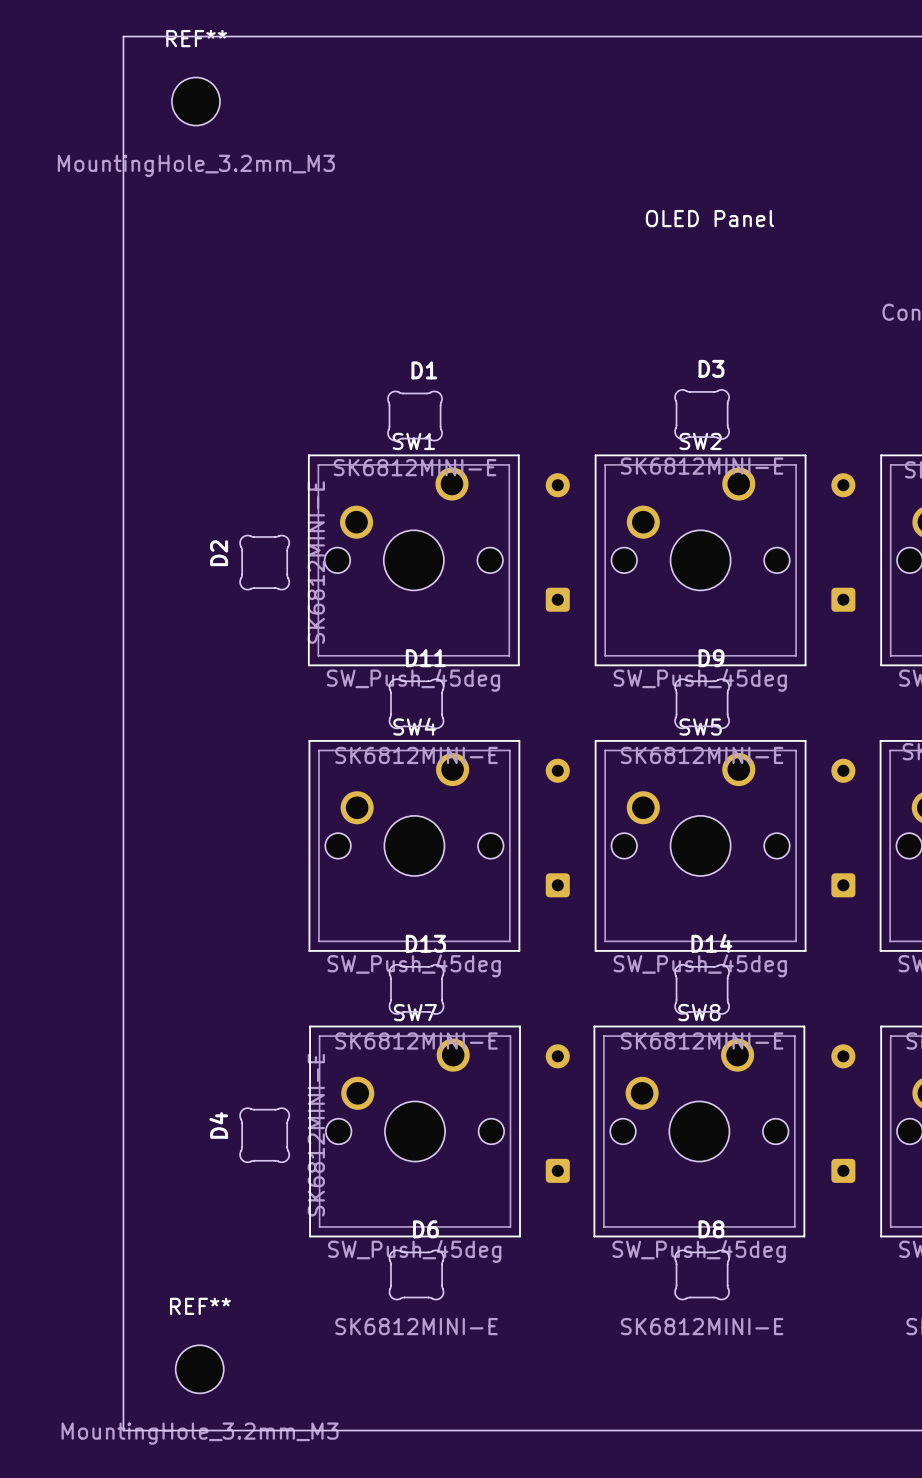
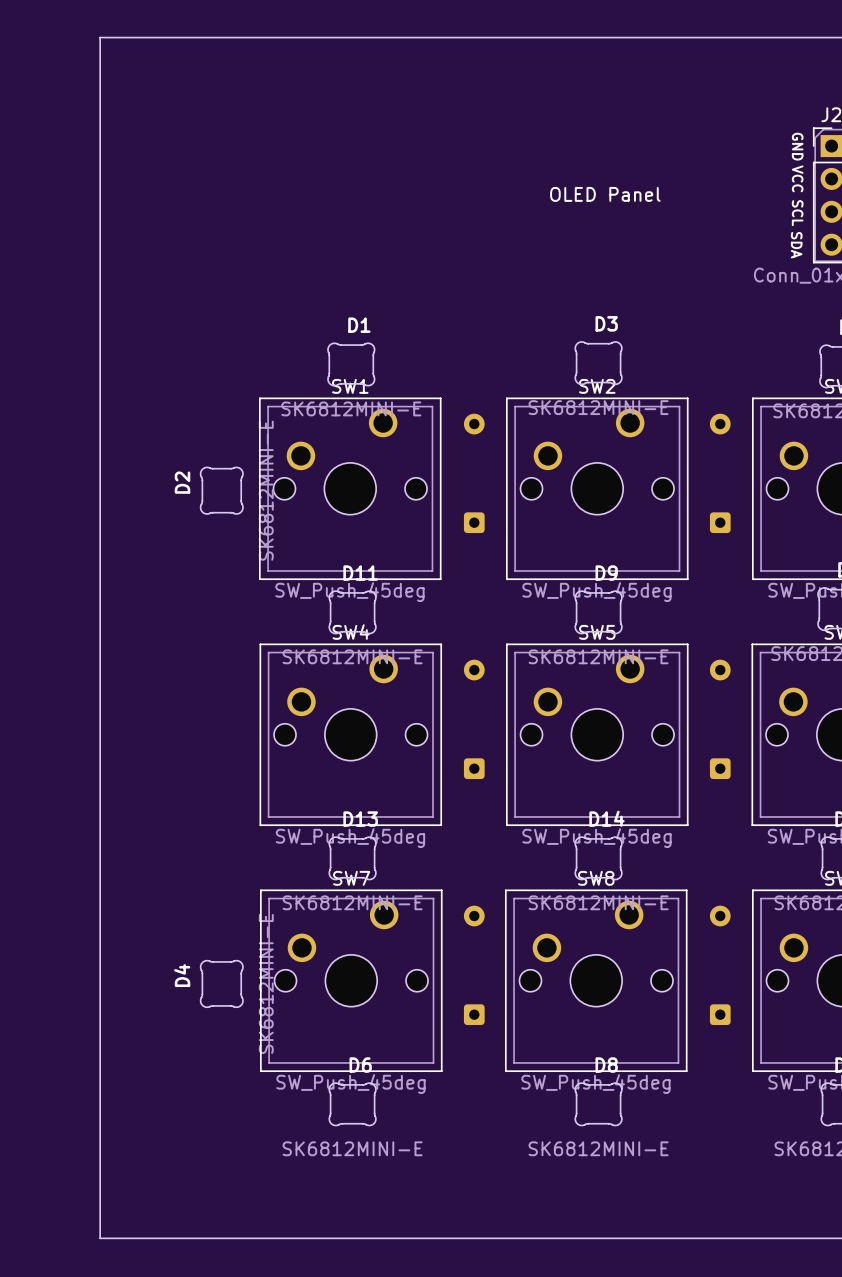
REF**: MountingHole_3.2mm_M3 (195, 101) -> none
REF**: MountingHole_3.2mm_M3 (199, 1369) -> none

